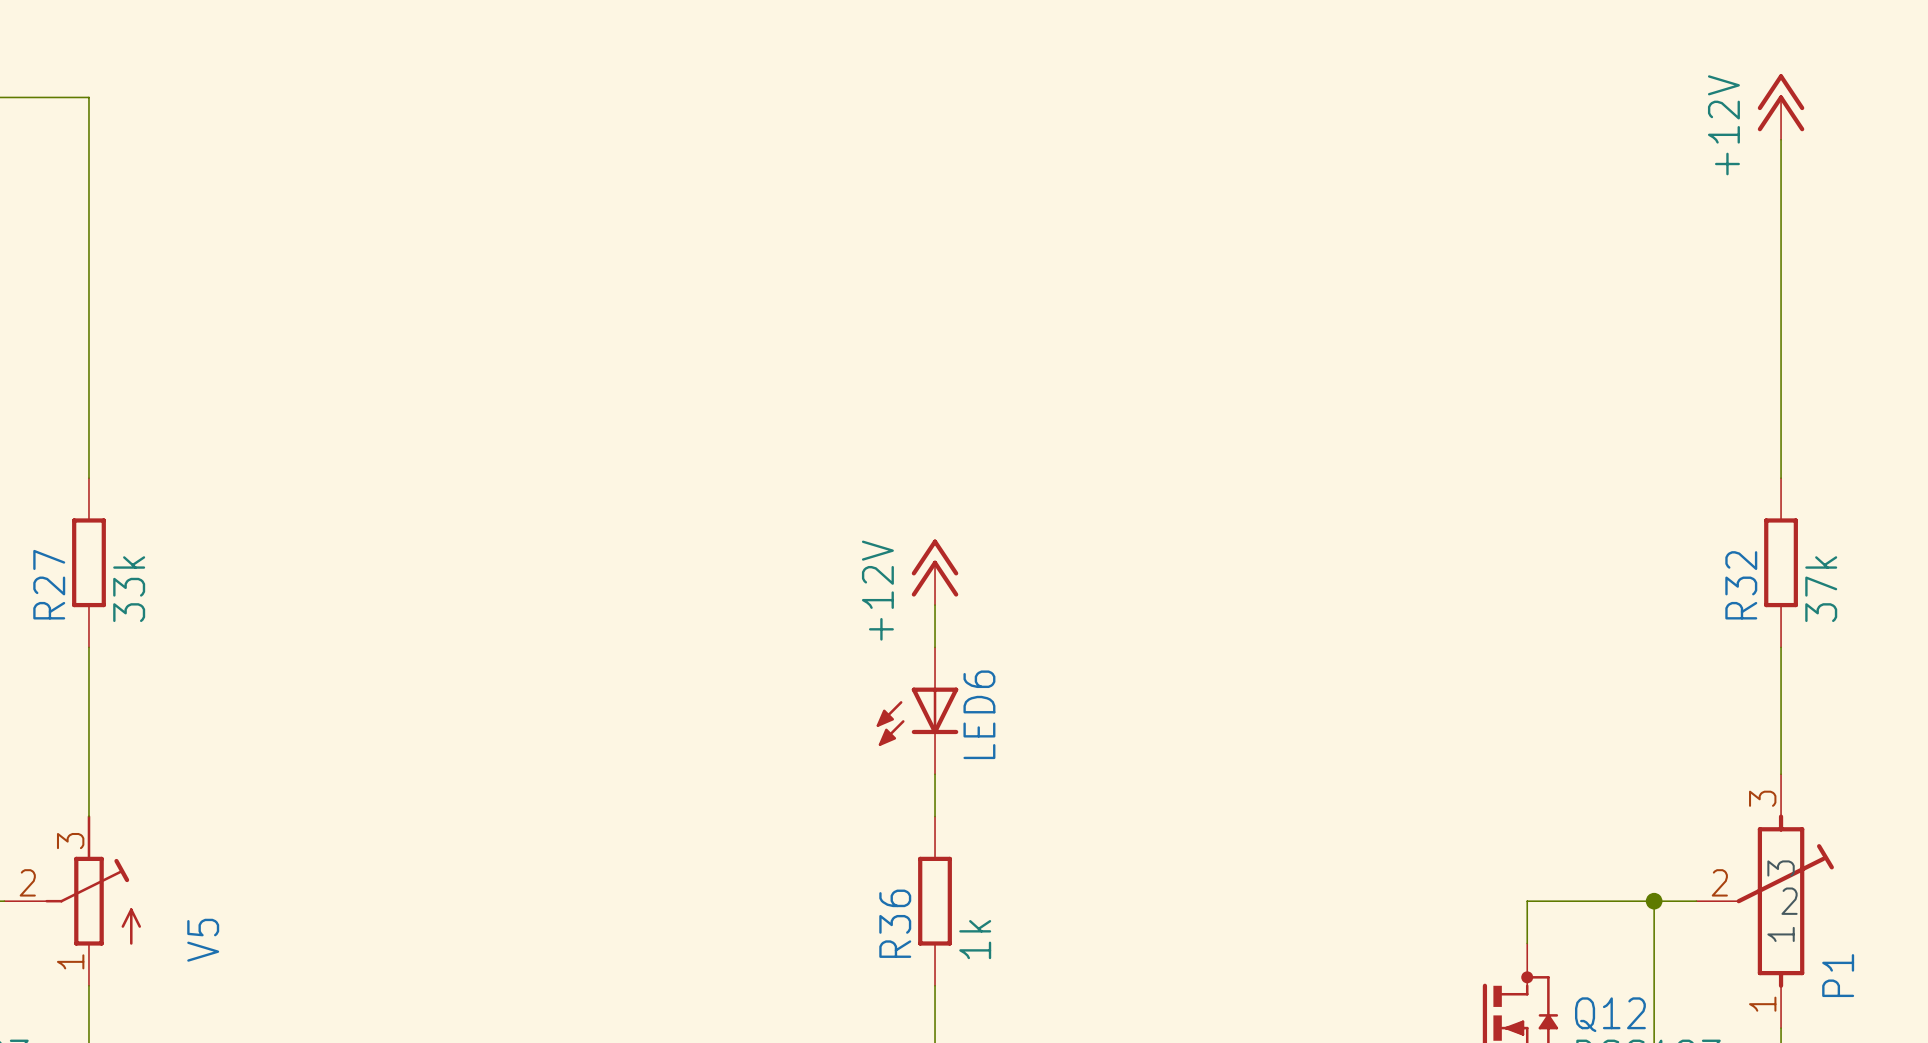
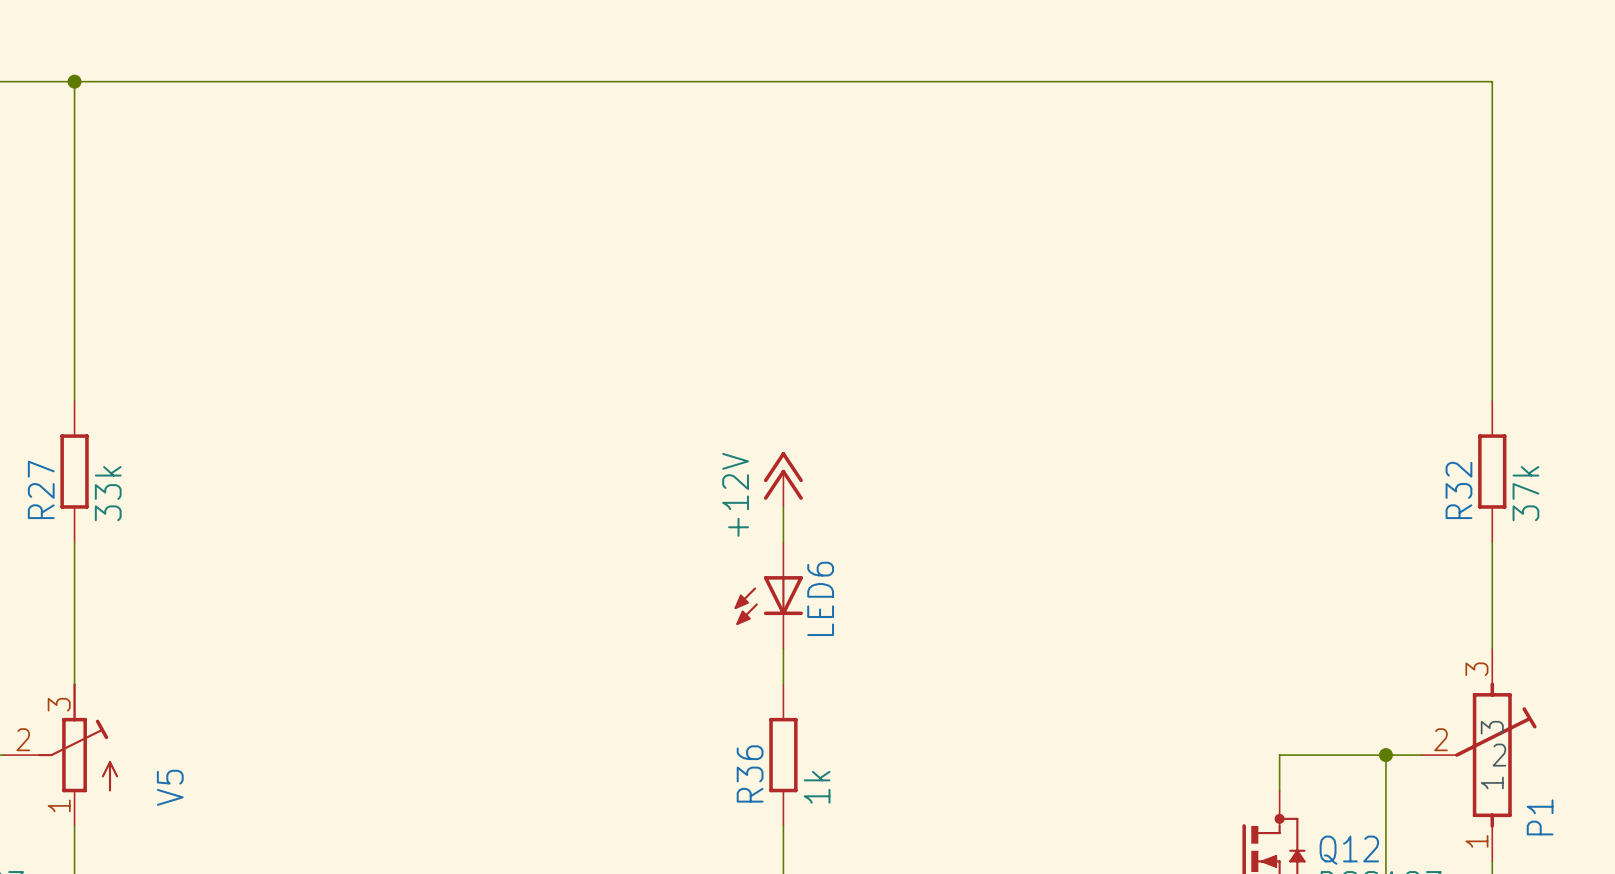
wire: none -> (74, 81) (1492, 81) (1492, 117)
junction: none -> (74, 81)
power symbol: +12V (1781, 106) -> none

